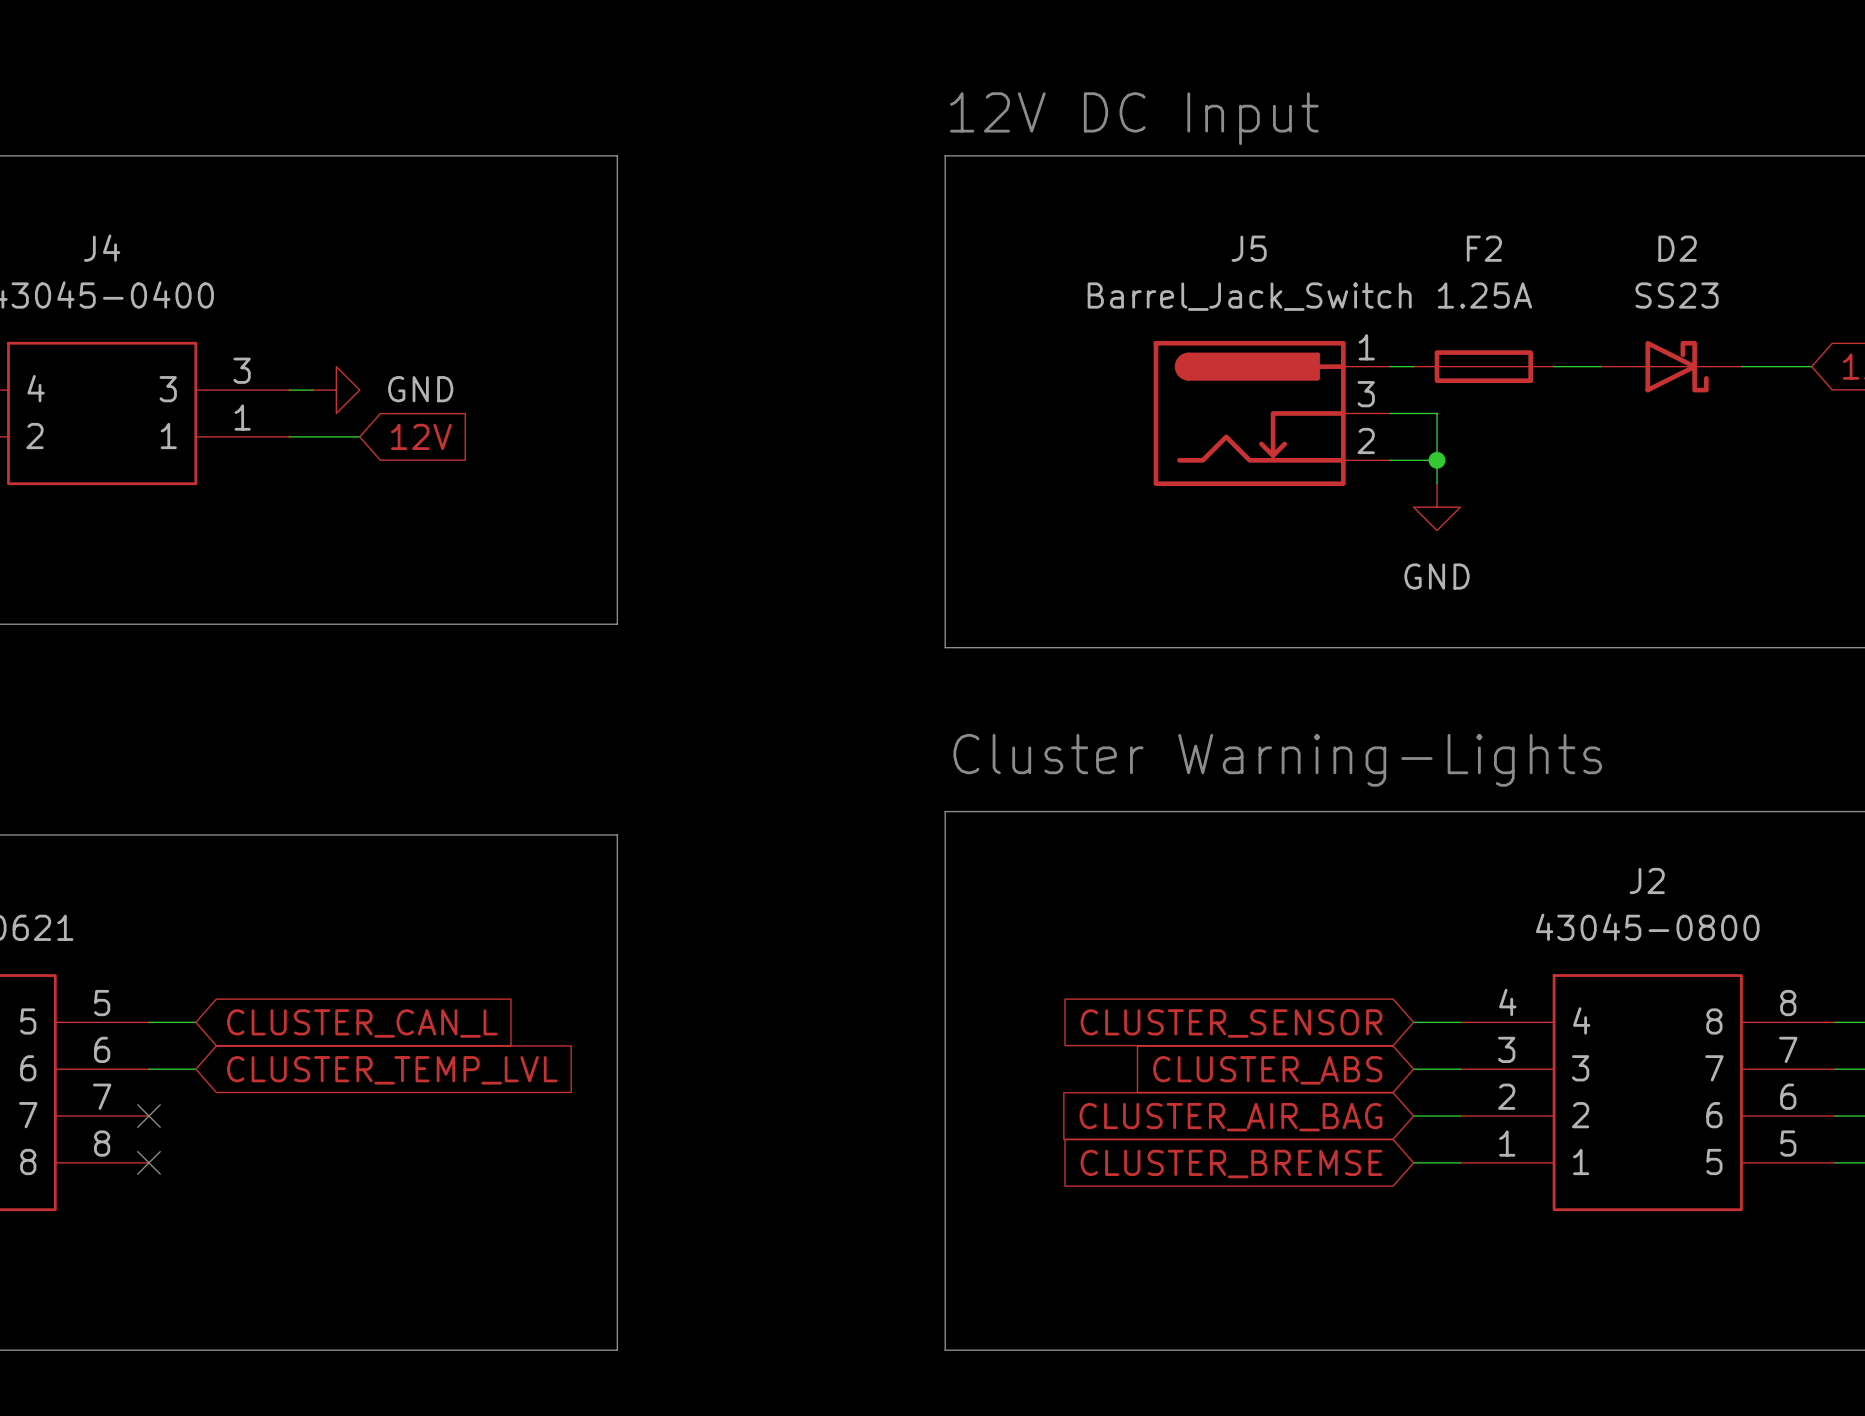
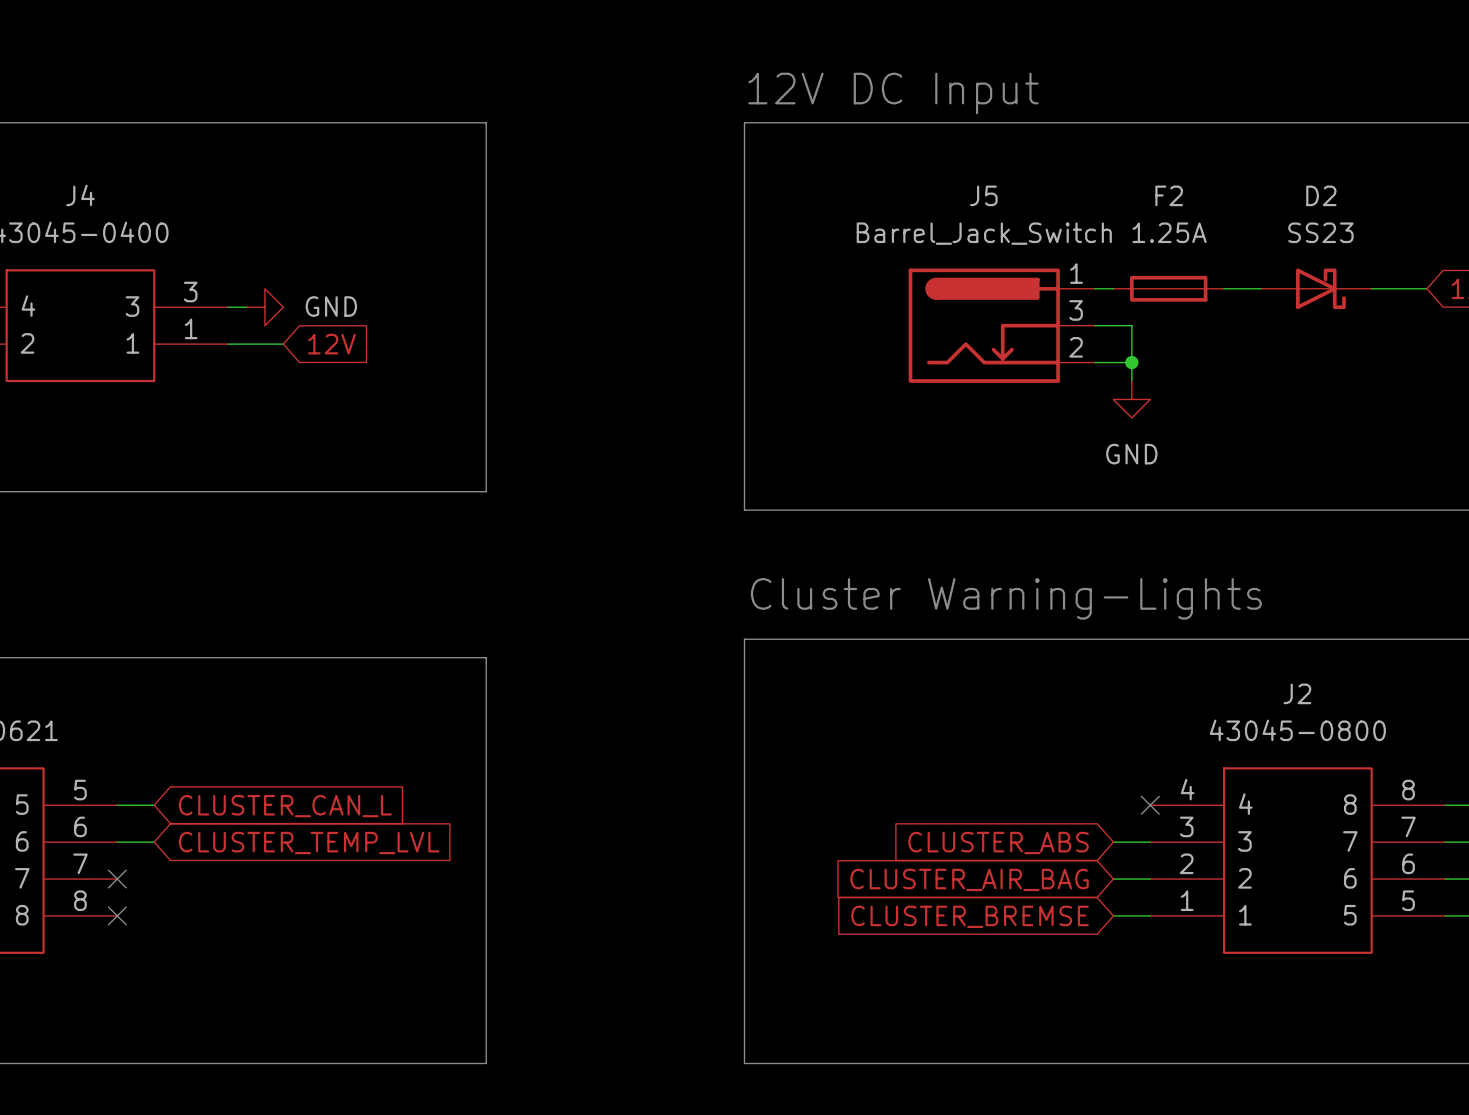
wire: (1413, 1022) (1460, 1022) -> none
no-connect mark: none -> (1150, 805)
global label: CLUSTER_SENSOR (1231, 1023) -> none

